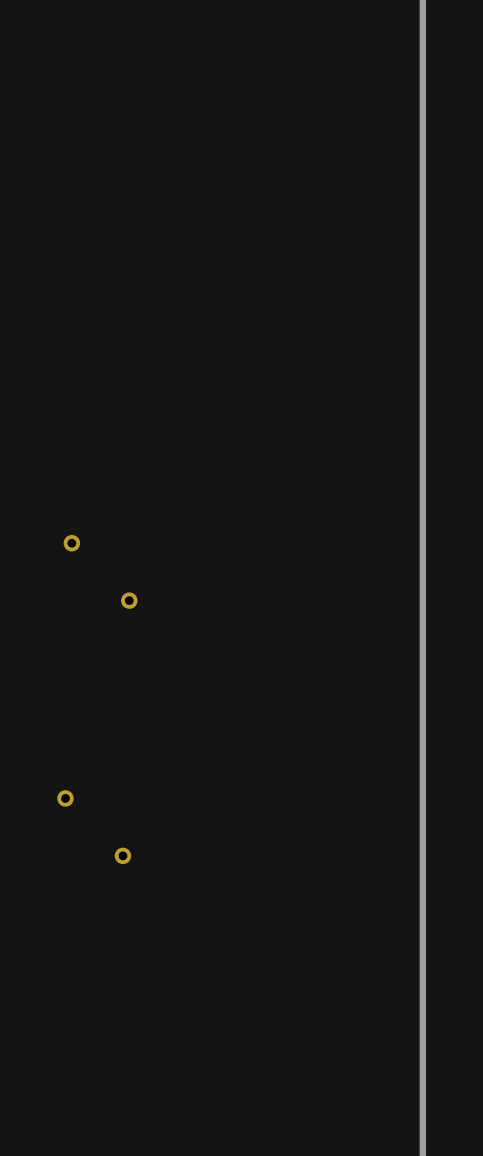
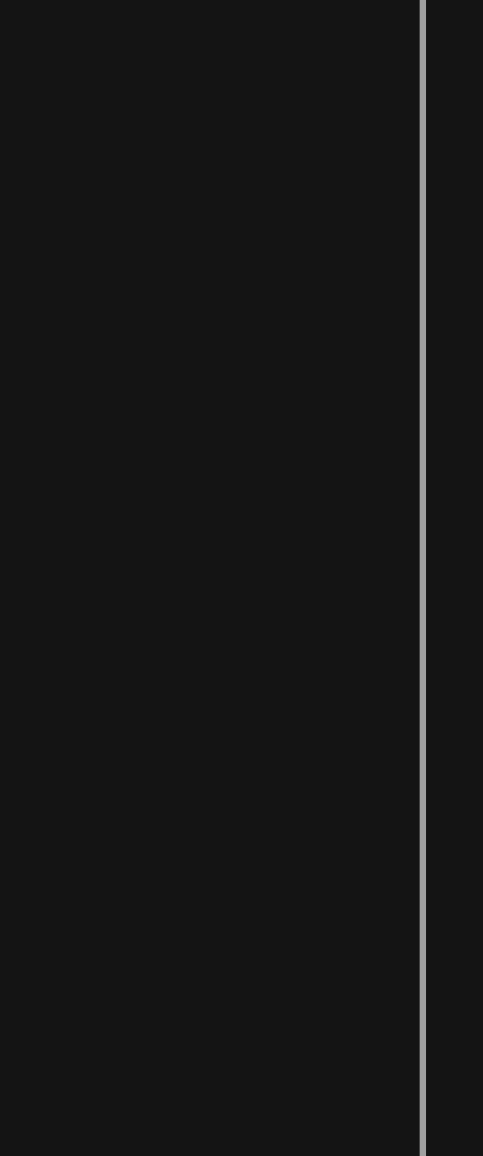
via: (71, 543) -> none
via: (129, 600) -> none
via: (65, 798) -> none
via: (122, 855) -> none

